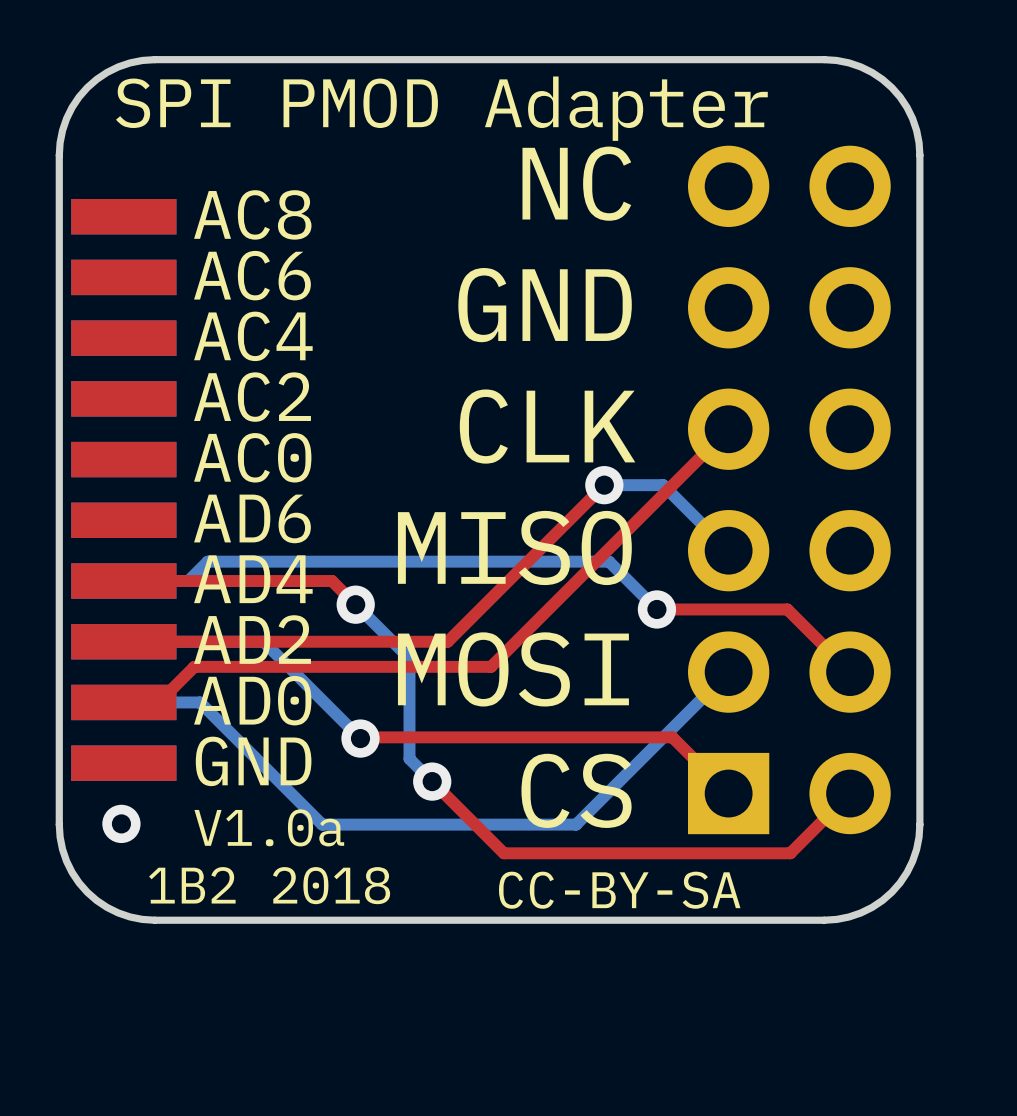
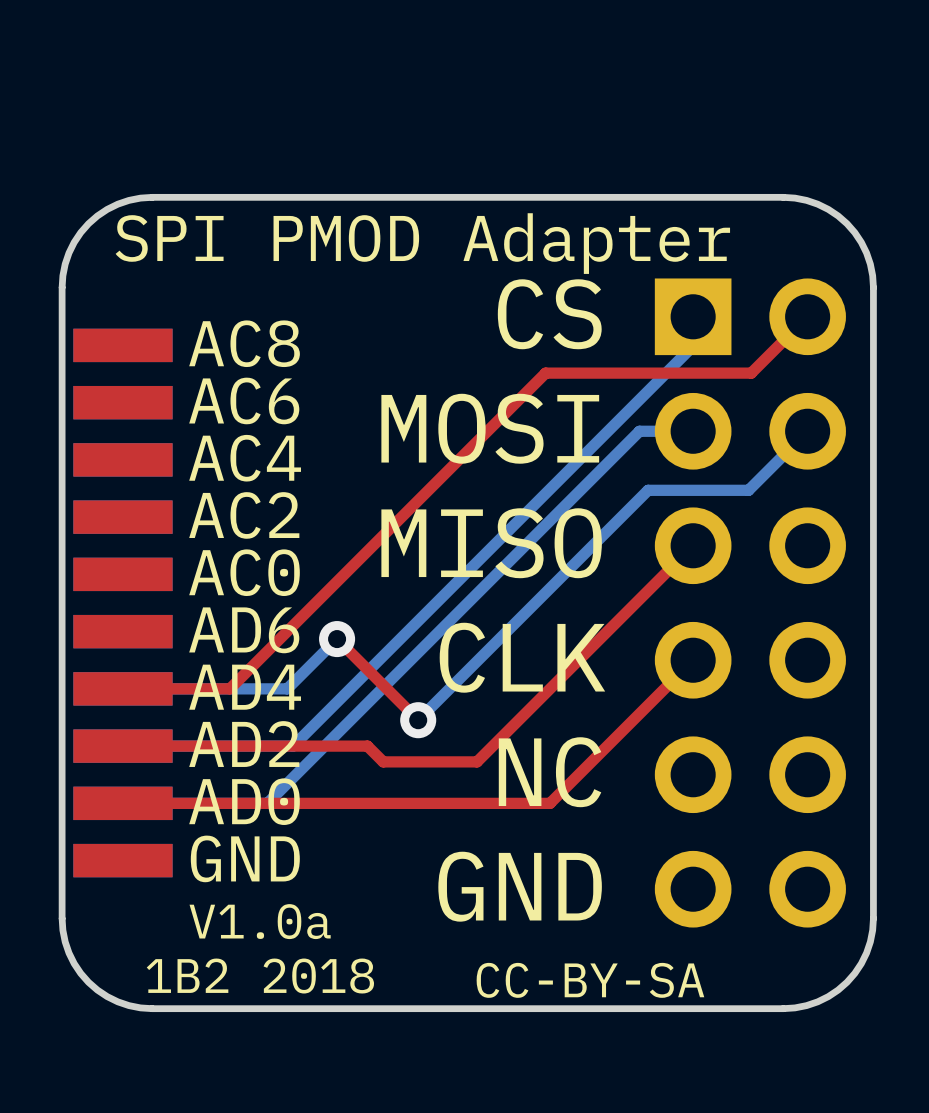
part footprint: [688, 145, 891, 835] -> [654, 278, 846, 928]
text: NC (576, 183) -> CS (549, 314)
text: GND (545, 305) -> MOSI (490, 428)
bottom track: none -> (807, 431) (748, 490) (648, 490) (418, 720)
text: CLK (547, 426) -> MISO (491, 543)
bottom track: (604, 485) (663, 485) (728, 550) -> none
top track: (604, 485) (447, 641) (383, 641) -> (477, 761) (383, 761) (367, 746)
via: (604, 485) -> none
top track: none -> (337, 639) (418, 720)
via: none -> (337, 639)
text: MISO (514, 547) -> CLK (522, 657)
bottom track: (188, 581) (207, 561) (609, 561) (656, 609) -> (183, 688) (287, 688) (337, 639)
top track: (237, 581) (332, 581) (355, 604) -> (229, 688) (545, 373) (751, 373) (807, 316)
bottom track: (355, 604) (409, 658) (409, 758) (432, 781) -> none
via: (355, 604) -> none
top track: (656, 609) (787, 609) (850, 672) -> none
via: (656, 609) -> none
via: none -> (418, 720)
bottom track: (263, 641) (360, 738) -> (254, 746) (293, 746) (693, 346) (693, 316)
top track: (499, 658) (491, 666) (194, 666) (158, 702) -> (693, 660) (550, 803) (155, 803)
text: MOSI (513, 669) -> NC (550, 772)
bottom track: (728, 672) (576, 824) (322, 824) (200, 702) -> (693, 431) (639, 431) (267, 803) (194, 803)
top track: (360, 738) (672, 737) (728, 793) -> none
via: (360, 738) -> none
top track: (432, 781) (503, 853) (790, 853) (850, 793) -> none
via: (432, 781) -> none
text: CS (576, 790) -> GND (520, 886)
via: (121, 823) -> none

